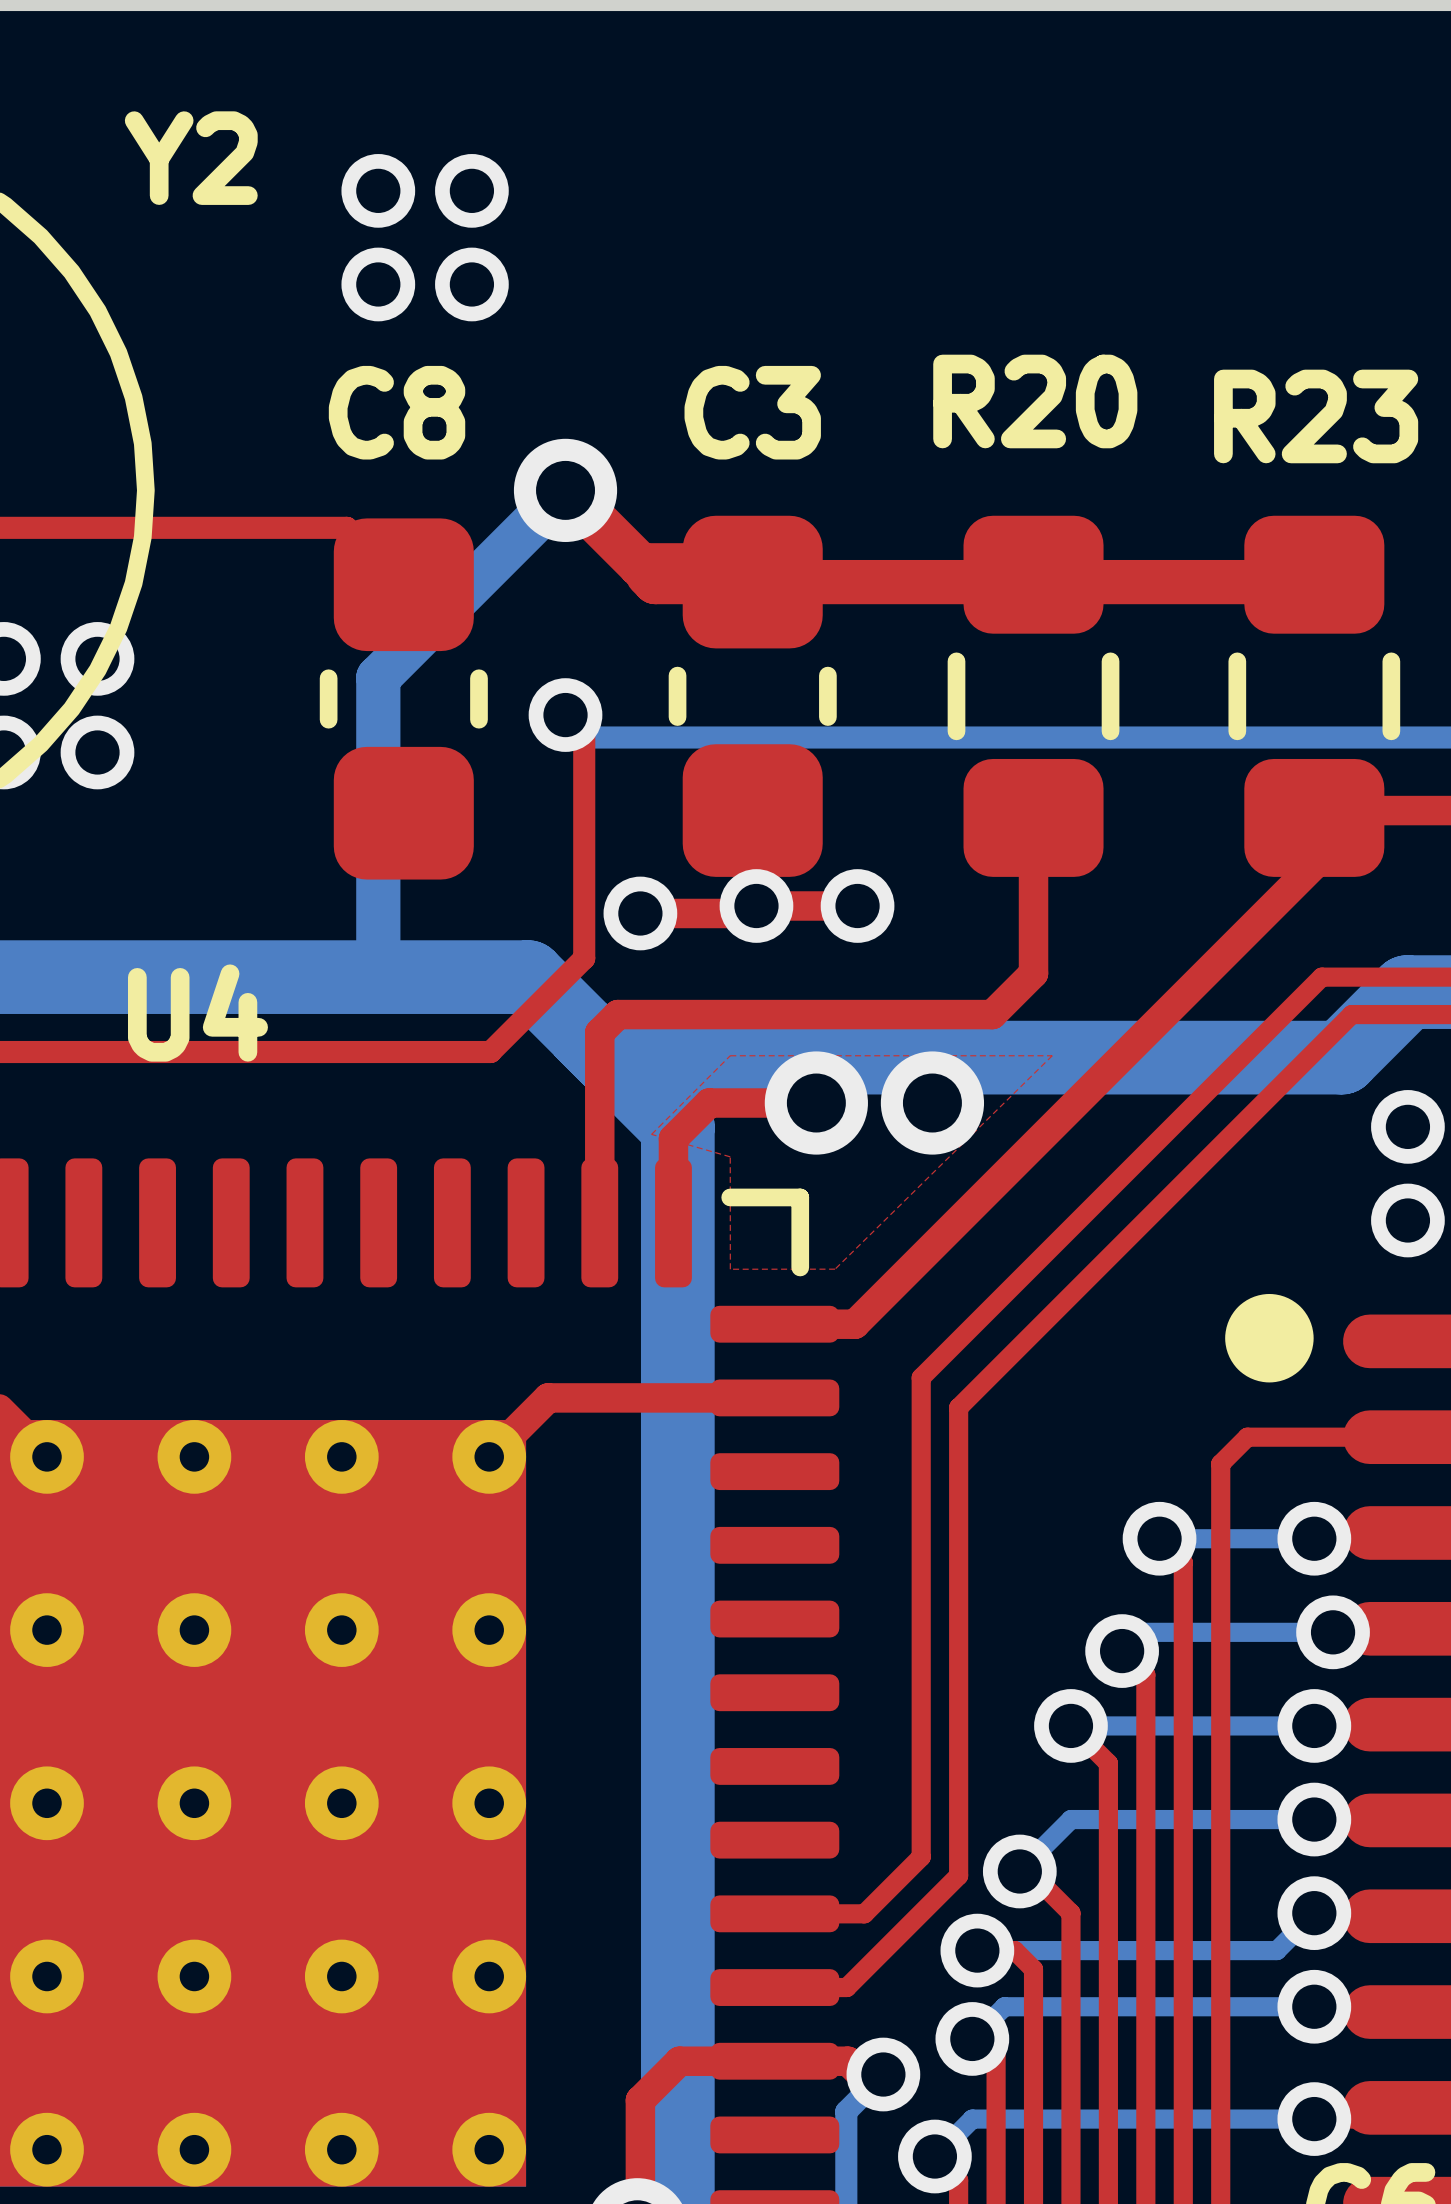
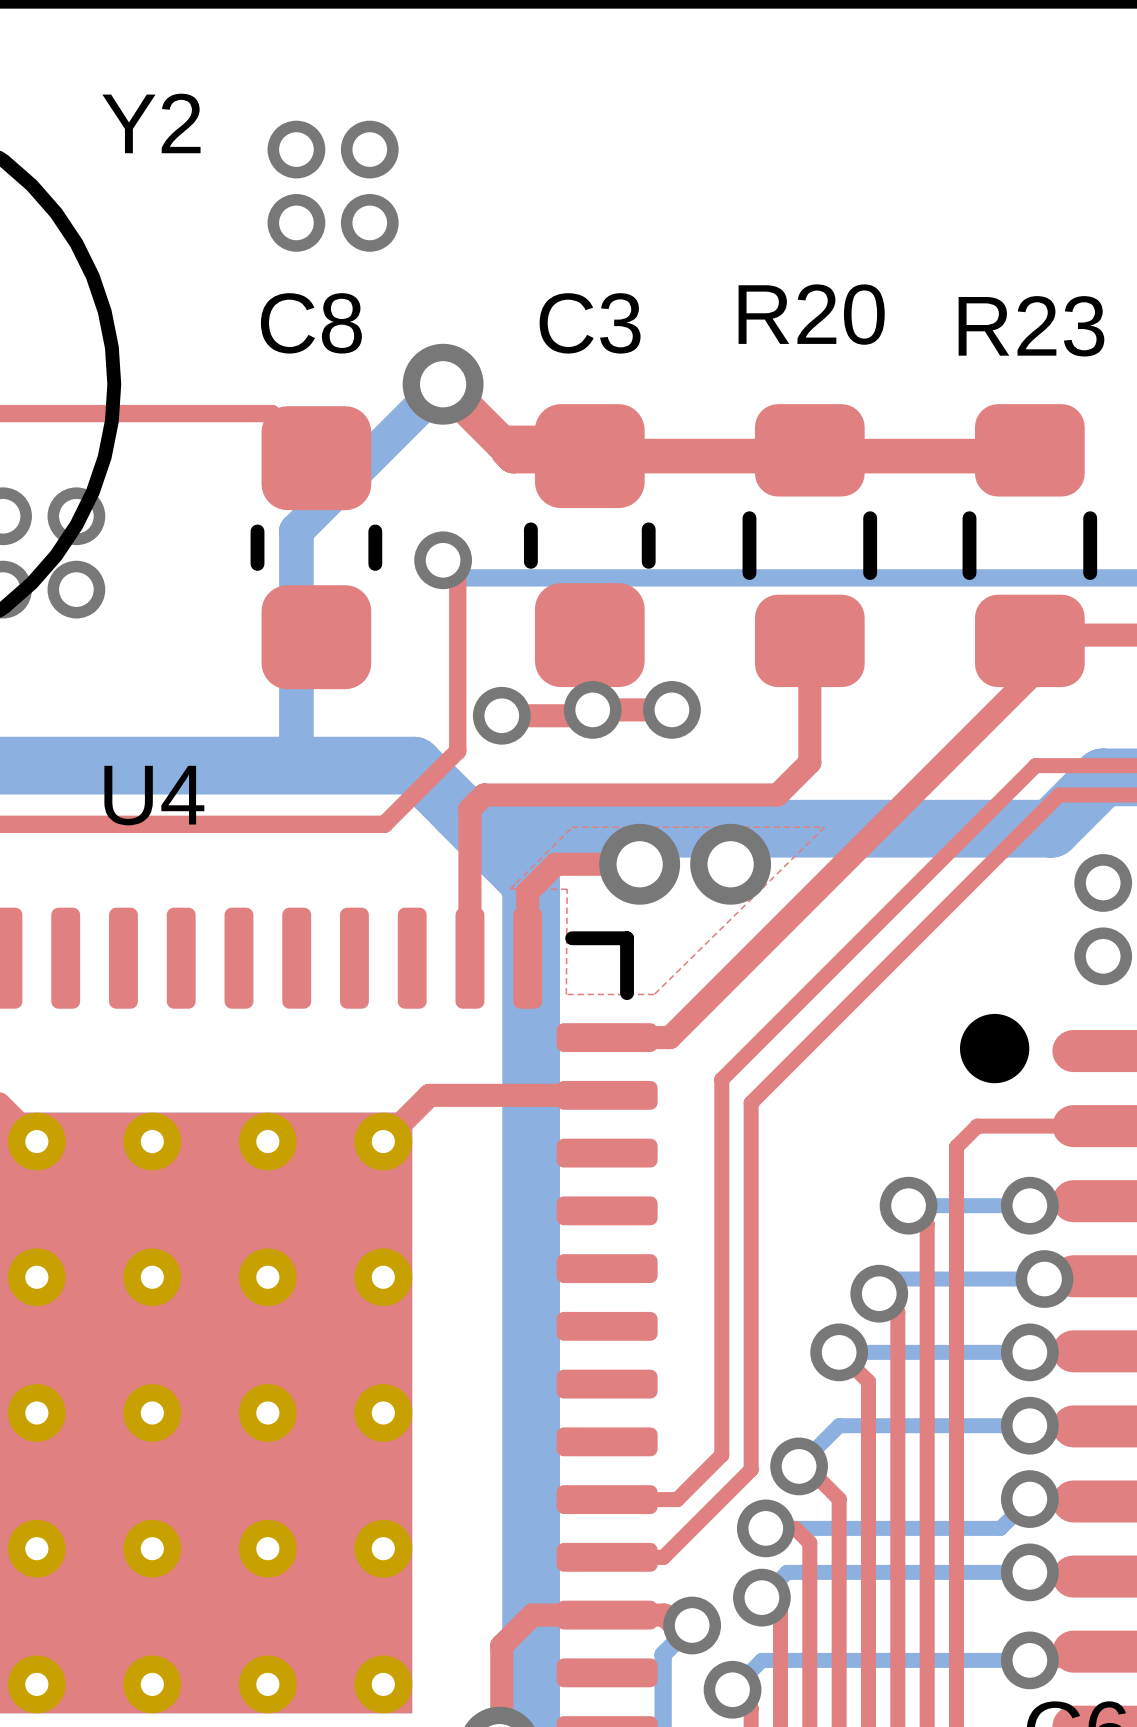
top zone outline: (651, 1134) (730, 1156) (730, 1269) (835, 1269) -> (510, 888) (567, 889) (566, 994) (654, 994)

